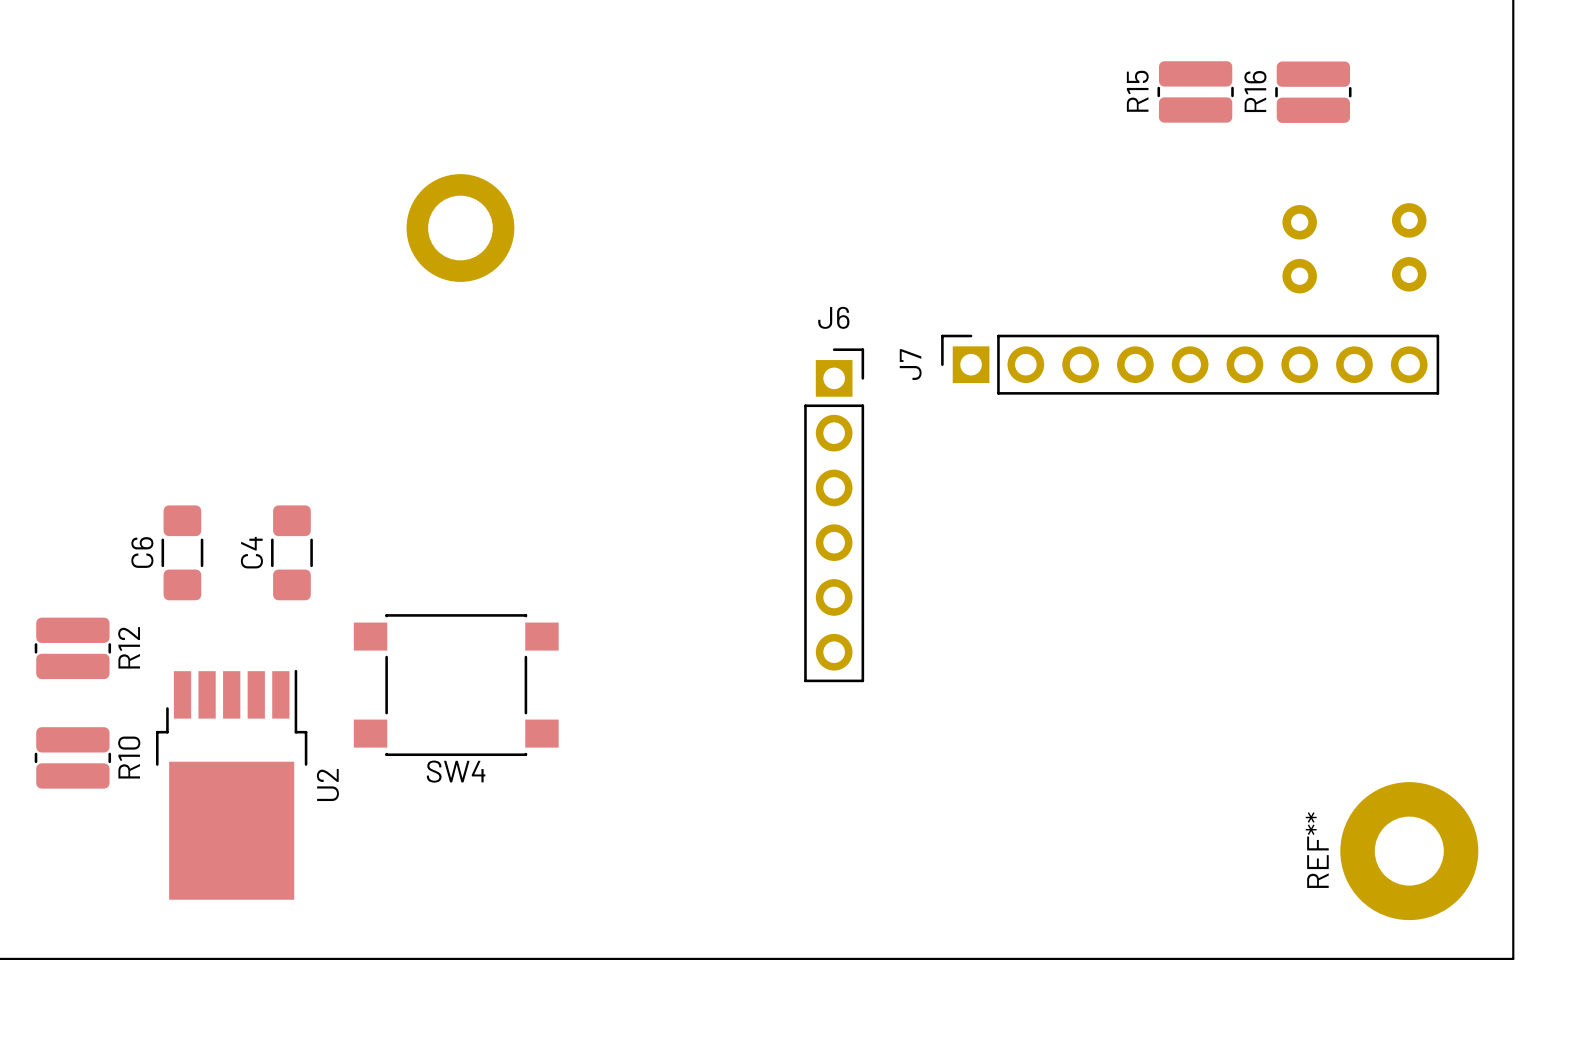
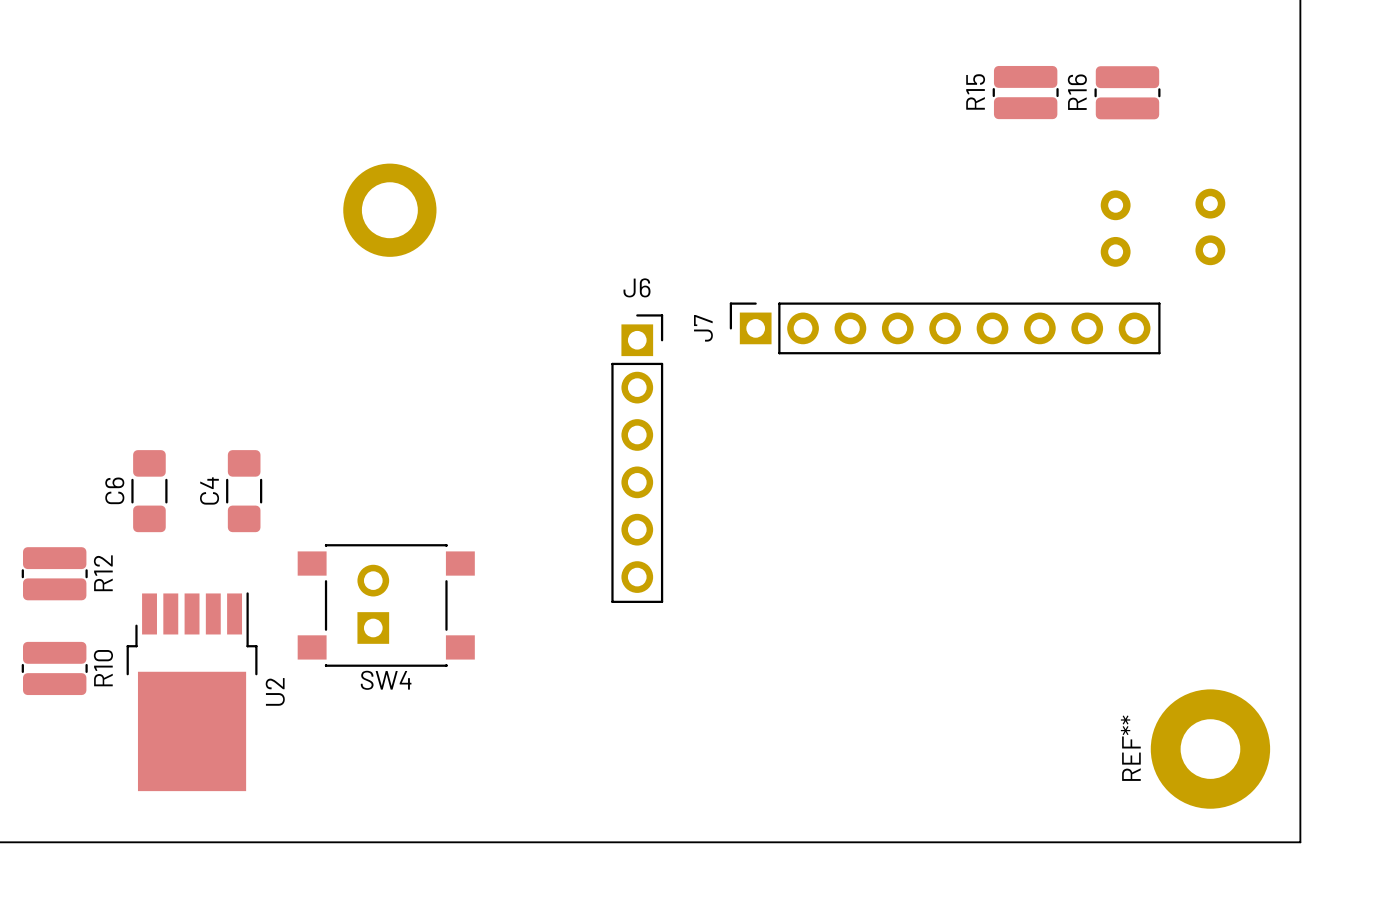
J7 position: (1190, 364) -> (945, 328)
J6 position: (834, 515) -> (637, 458)
part: none -> (373, 604)

